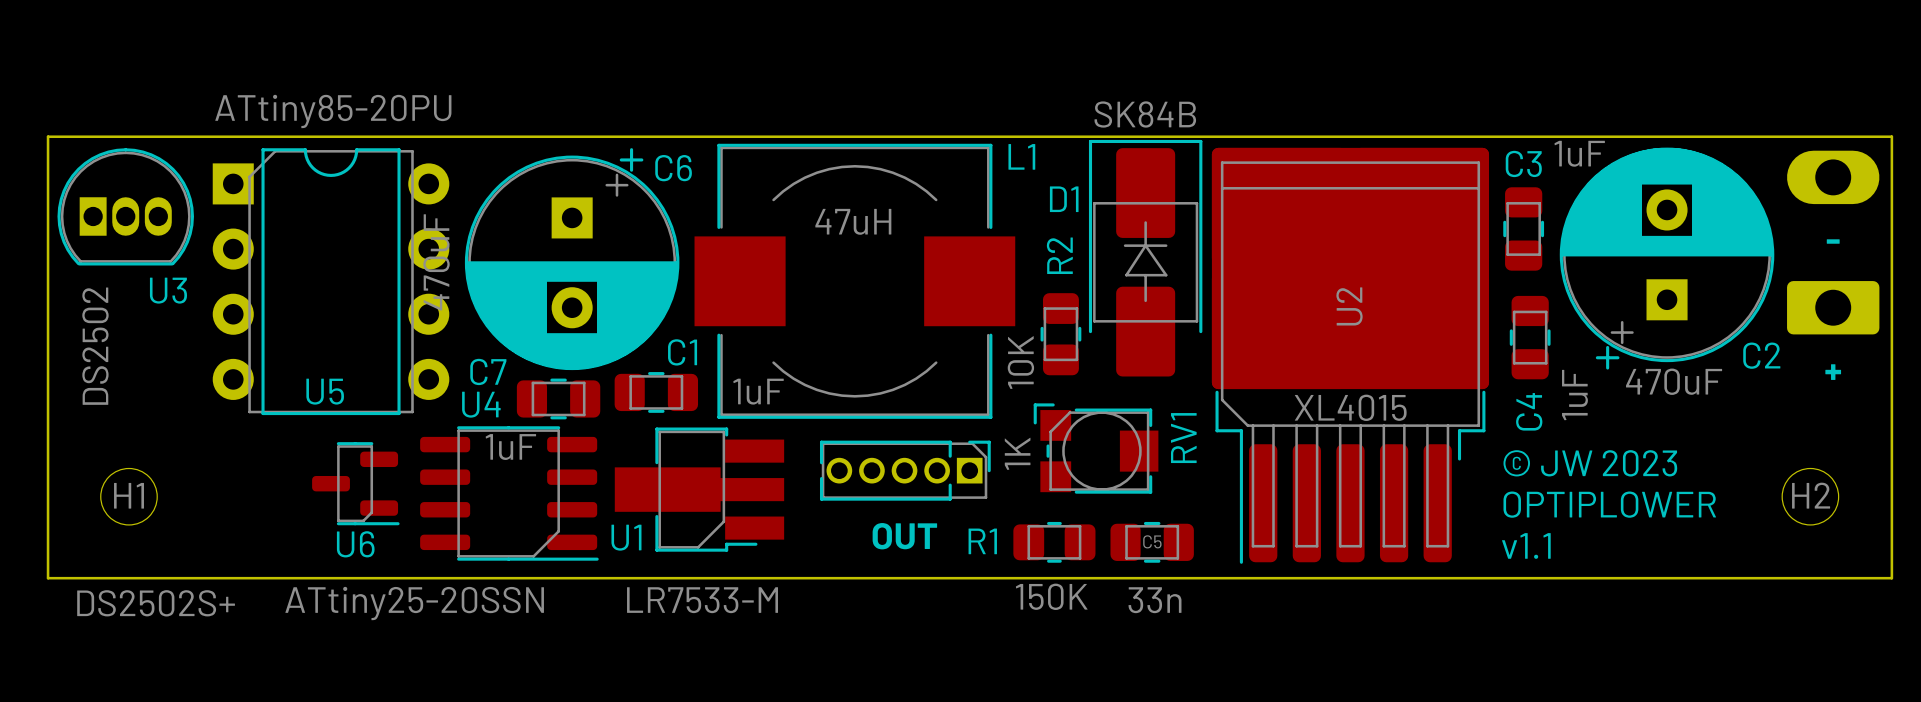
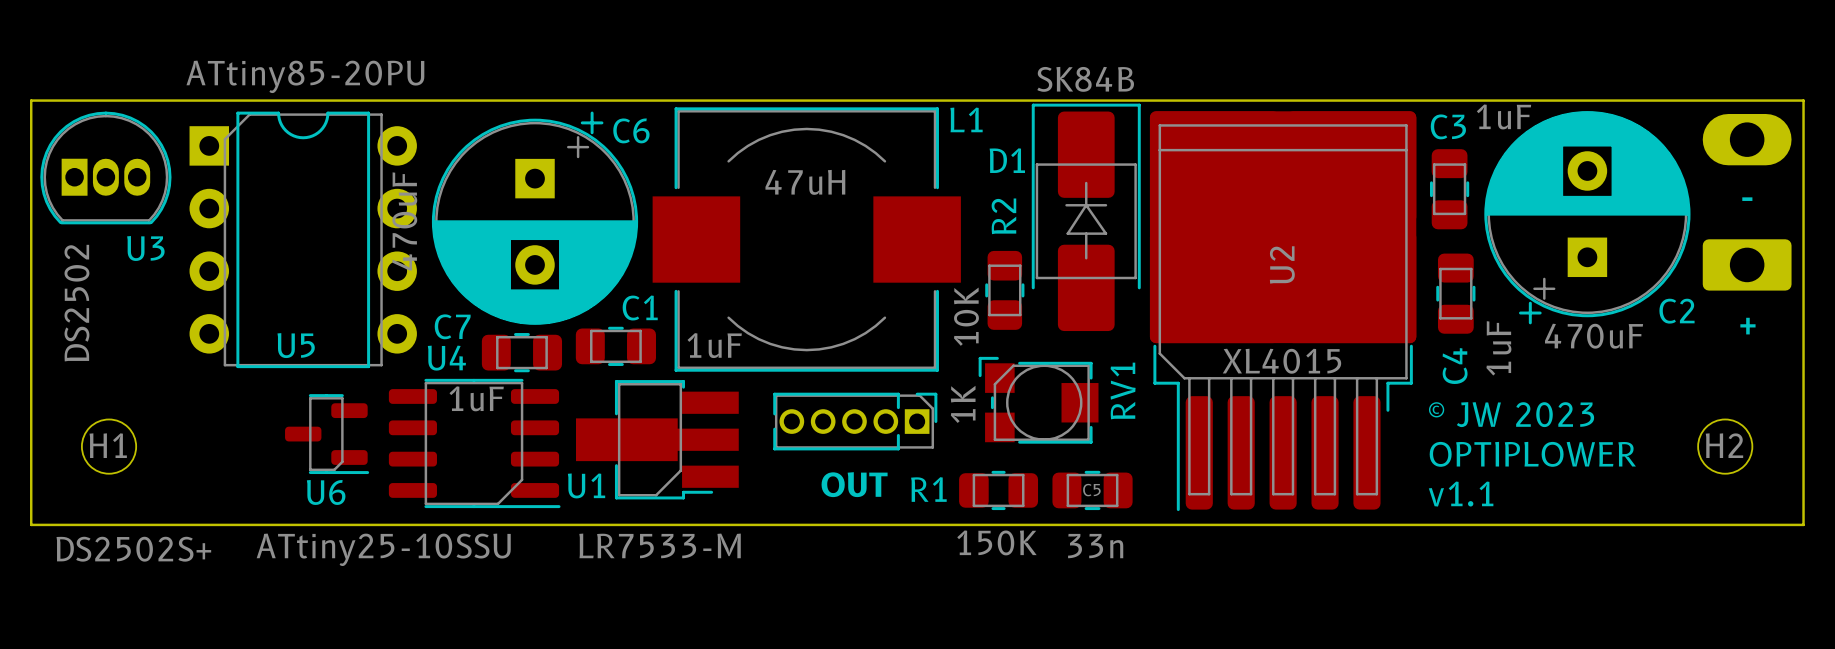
U4 value: ATtiny25-20SSN (414, 603) -> ATtiny25-10SSU (383, 549)

